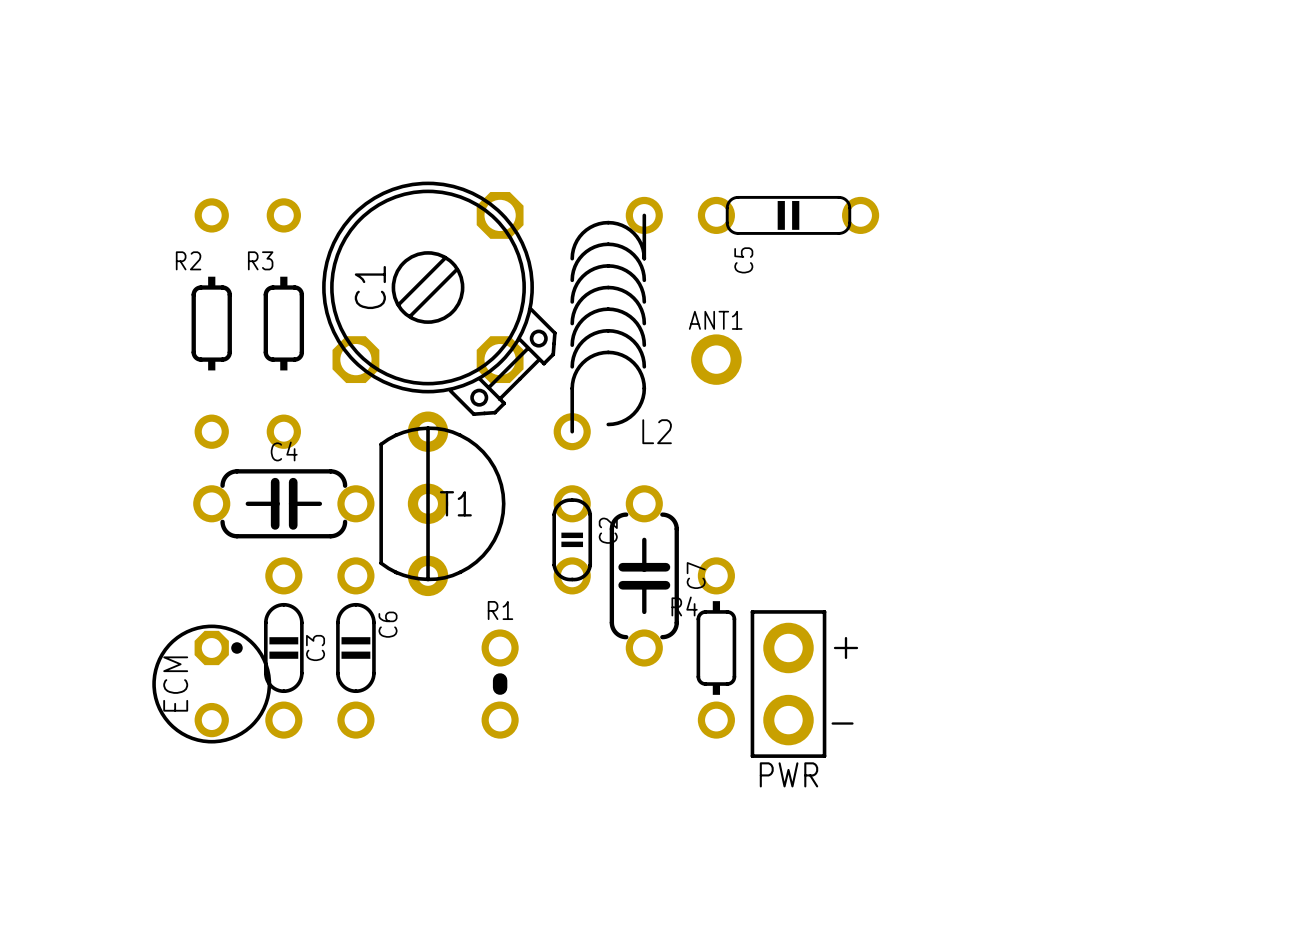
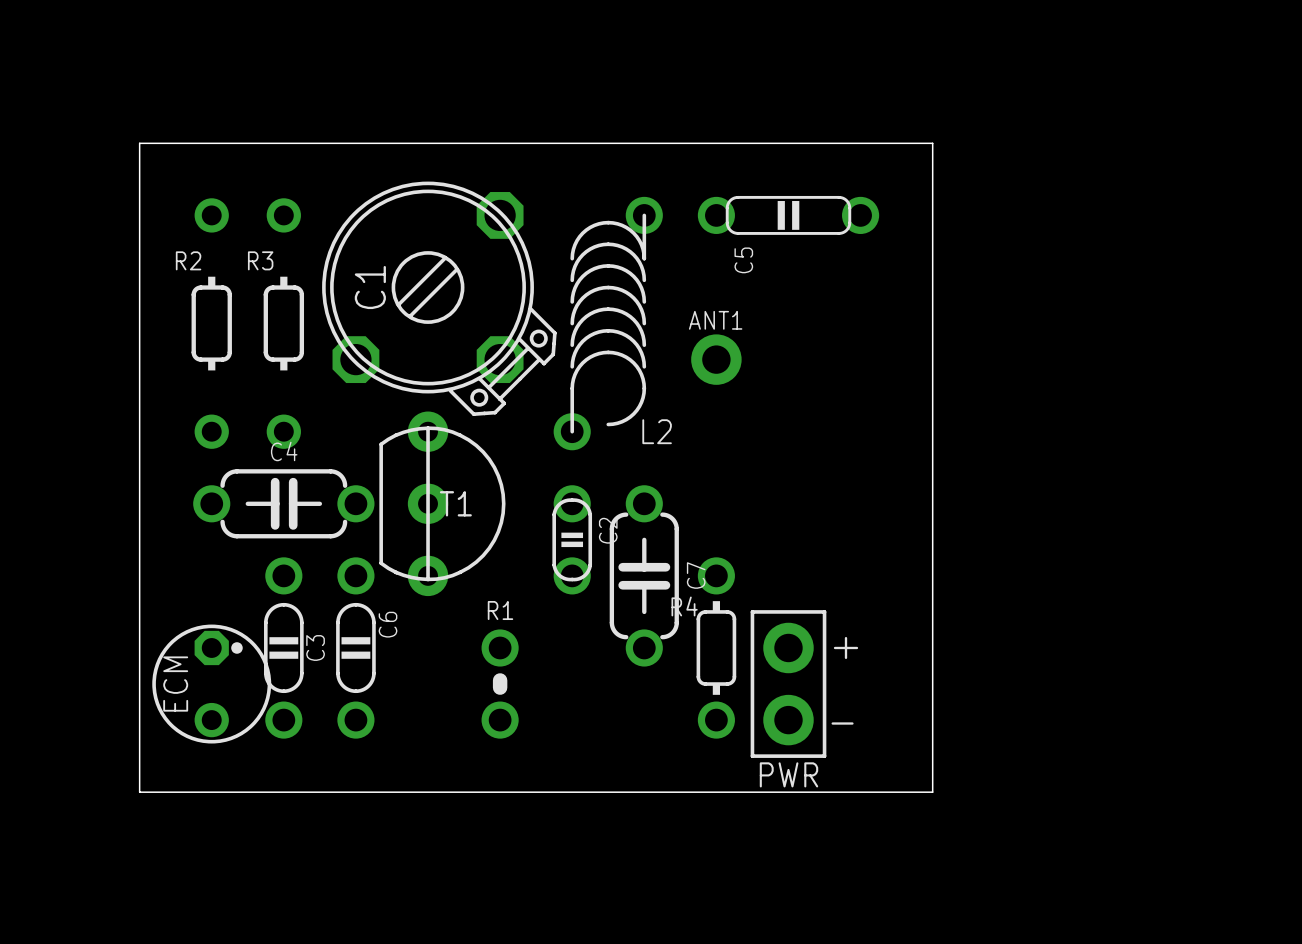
board edge: none -> (139, 143) (932, 143) (932, 792) (139, 792) (139, 143)

